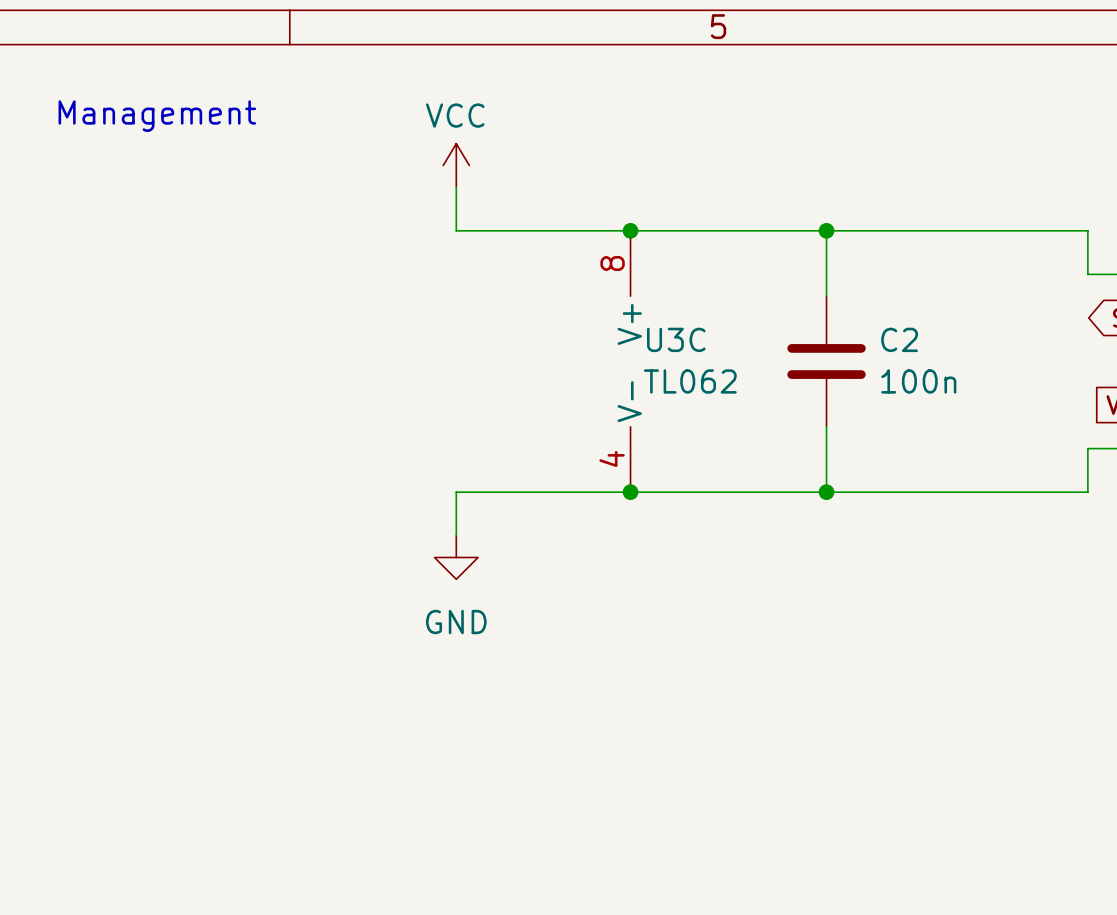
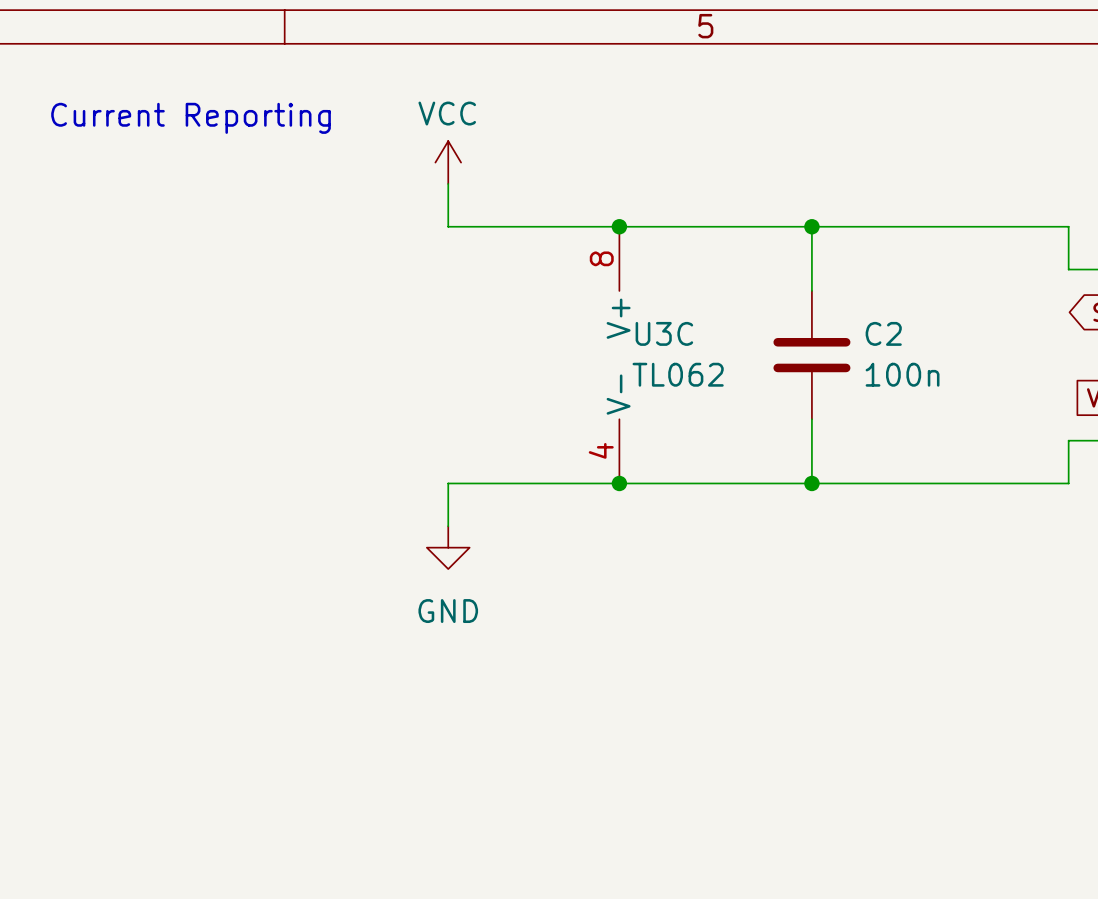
text: Management (157, 116) -> none
text: none -> Current Reporting (191, 118)

